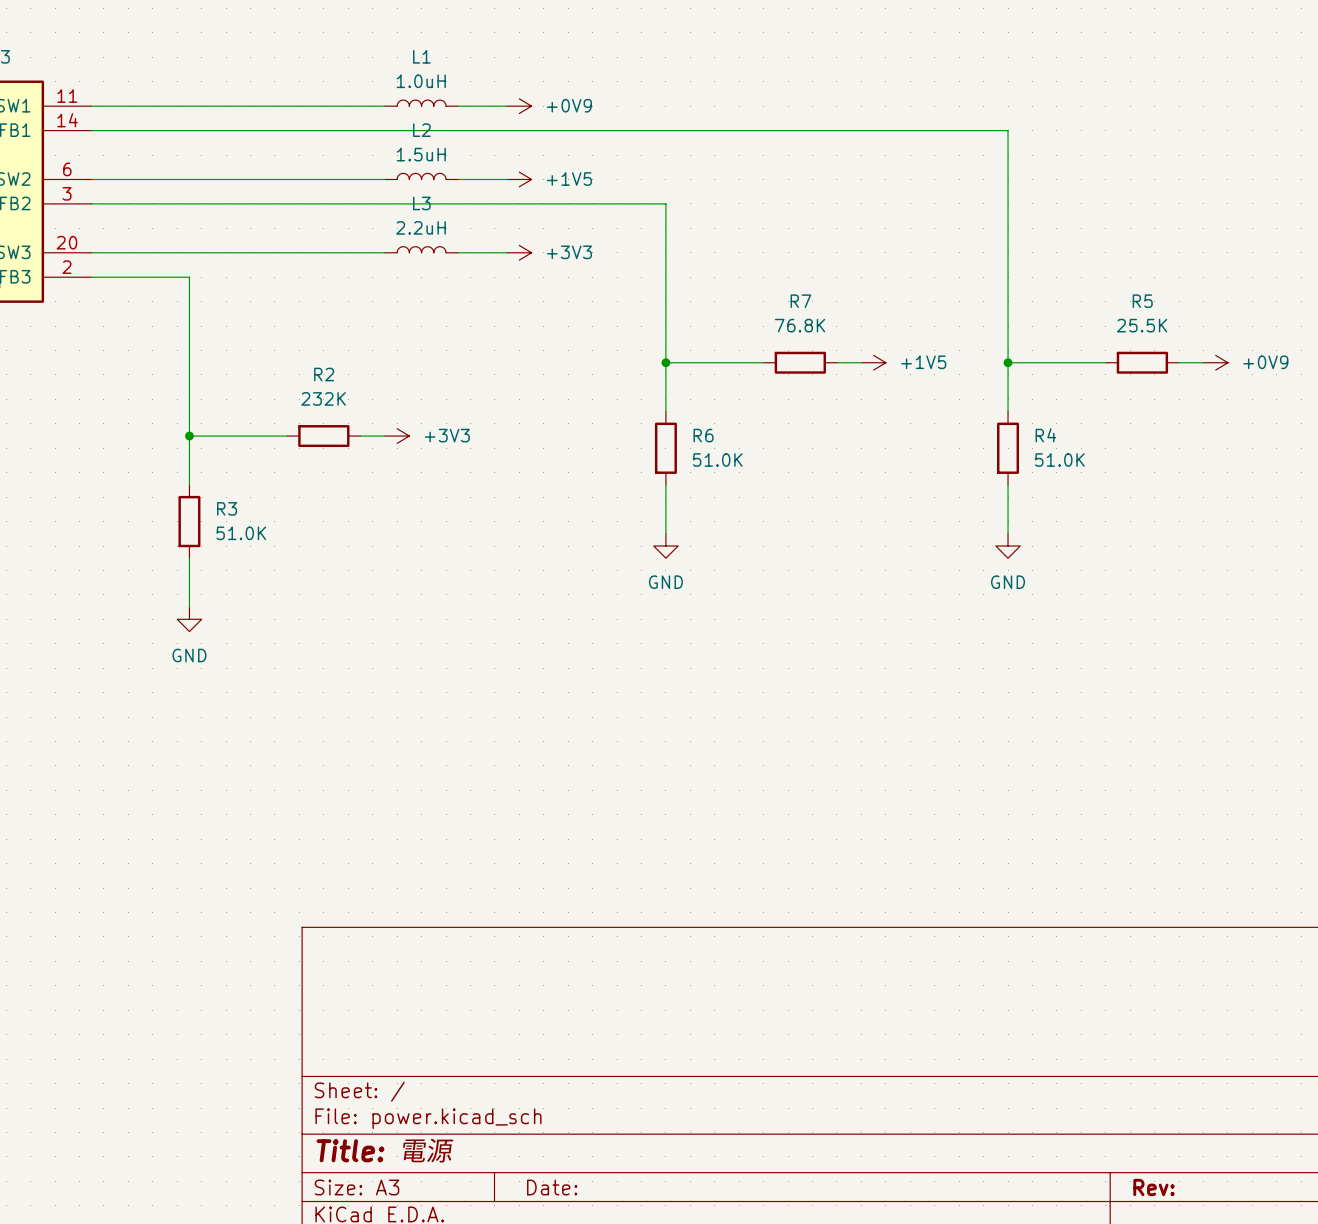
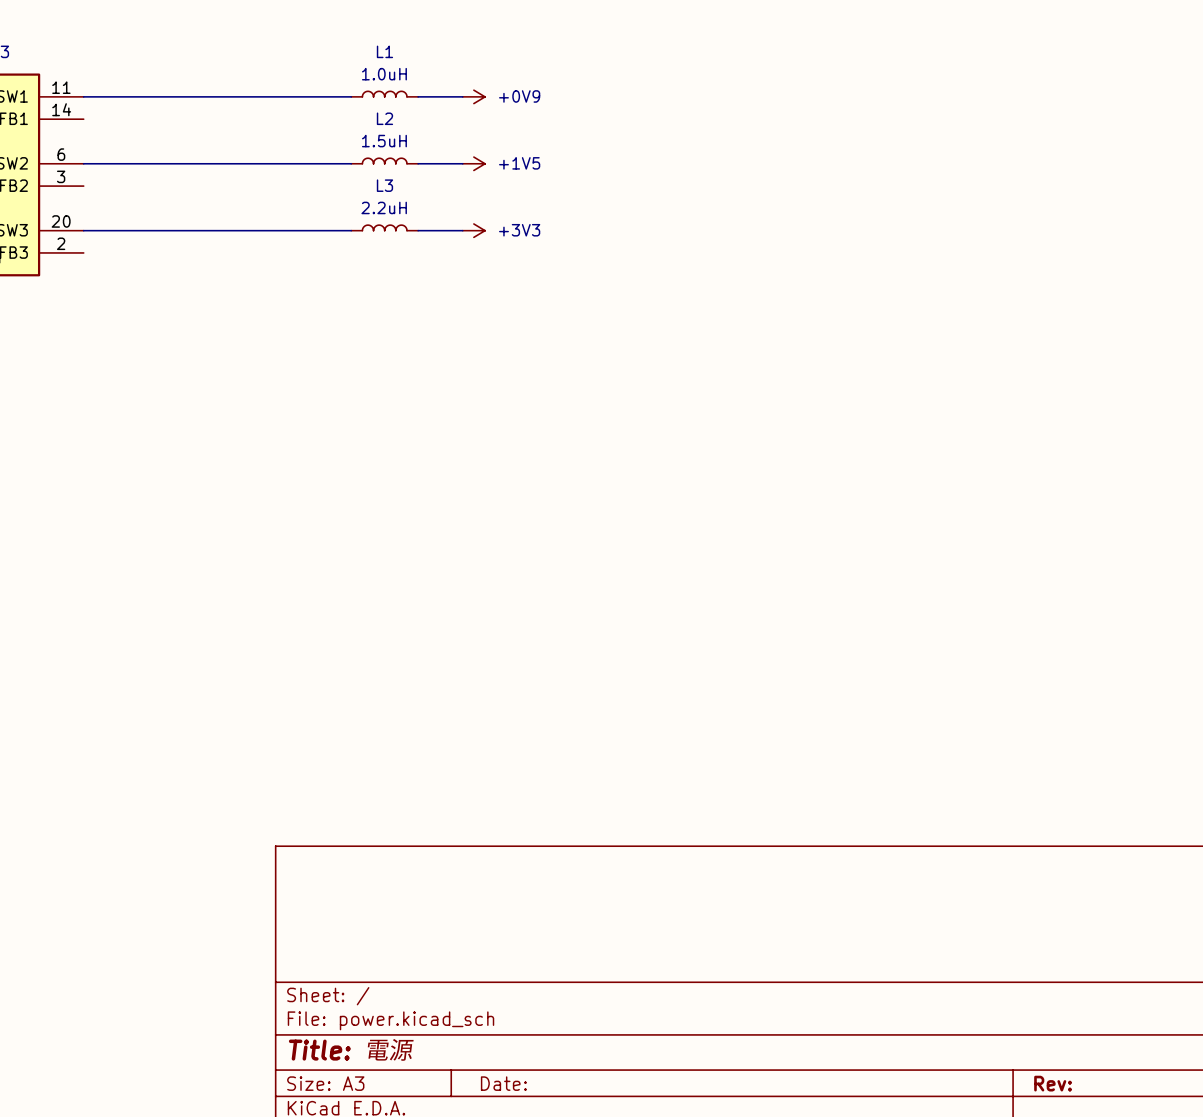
wire: (91, 130) (1008, 130) (1008, 411) -> none
wire: (91, 203) (665, 203) (665, 411) -> none
wire: (91, 277) (189, 277) (189, 484) -> none
wire: (665, 362) (763, 362) -> none
junction: (665, 362) -> none
R7: 76.8K (800, 362) -> none
wire: (836, 362) (861, 362) -> none
power symbol: +1V5 (873, 362) -> none
wire: (1008, 362) (1105, 362) -> none
junction: (1008, 362) -> none
R5: 25.5K (1142, 362) -> none
wire: (1179, 362) (1203, 362) -> none
power symbol: +0V9 (1215, 362) -> none
wire: (189, 436) (287, 436) -> none
junction: (189, 436) -> none
R2: 232K (323, 436) -> none
wire: (360, 436) (384, 436) -> none
power symbol: +3V3 (397, 436) -> none
R6: 51.0K (665, 448) -> none
R4: 51.0K (1008, 448) -> none
wire: (665, 484) (665, 533) -> none
wire: (1008, 484) (1008, 533) -> none
R3: 51.0K (189, 521) -> none
power symbol: GND (665, 546) -> none
power symbol: GND (1008, 546) -> none
wire: (189, 558) (189, 607) -> none
power symbol: GND (189, 619) -> none

